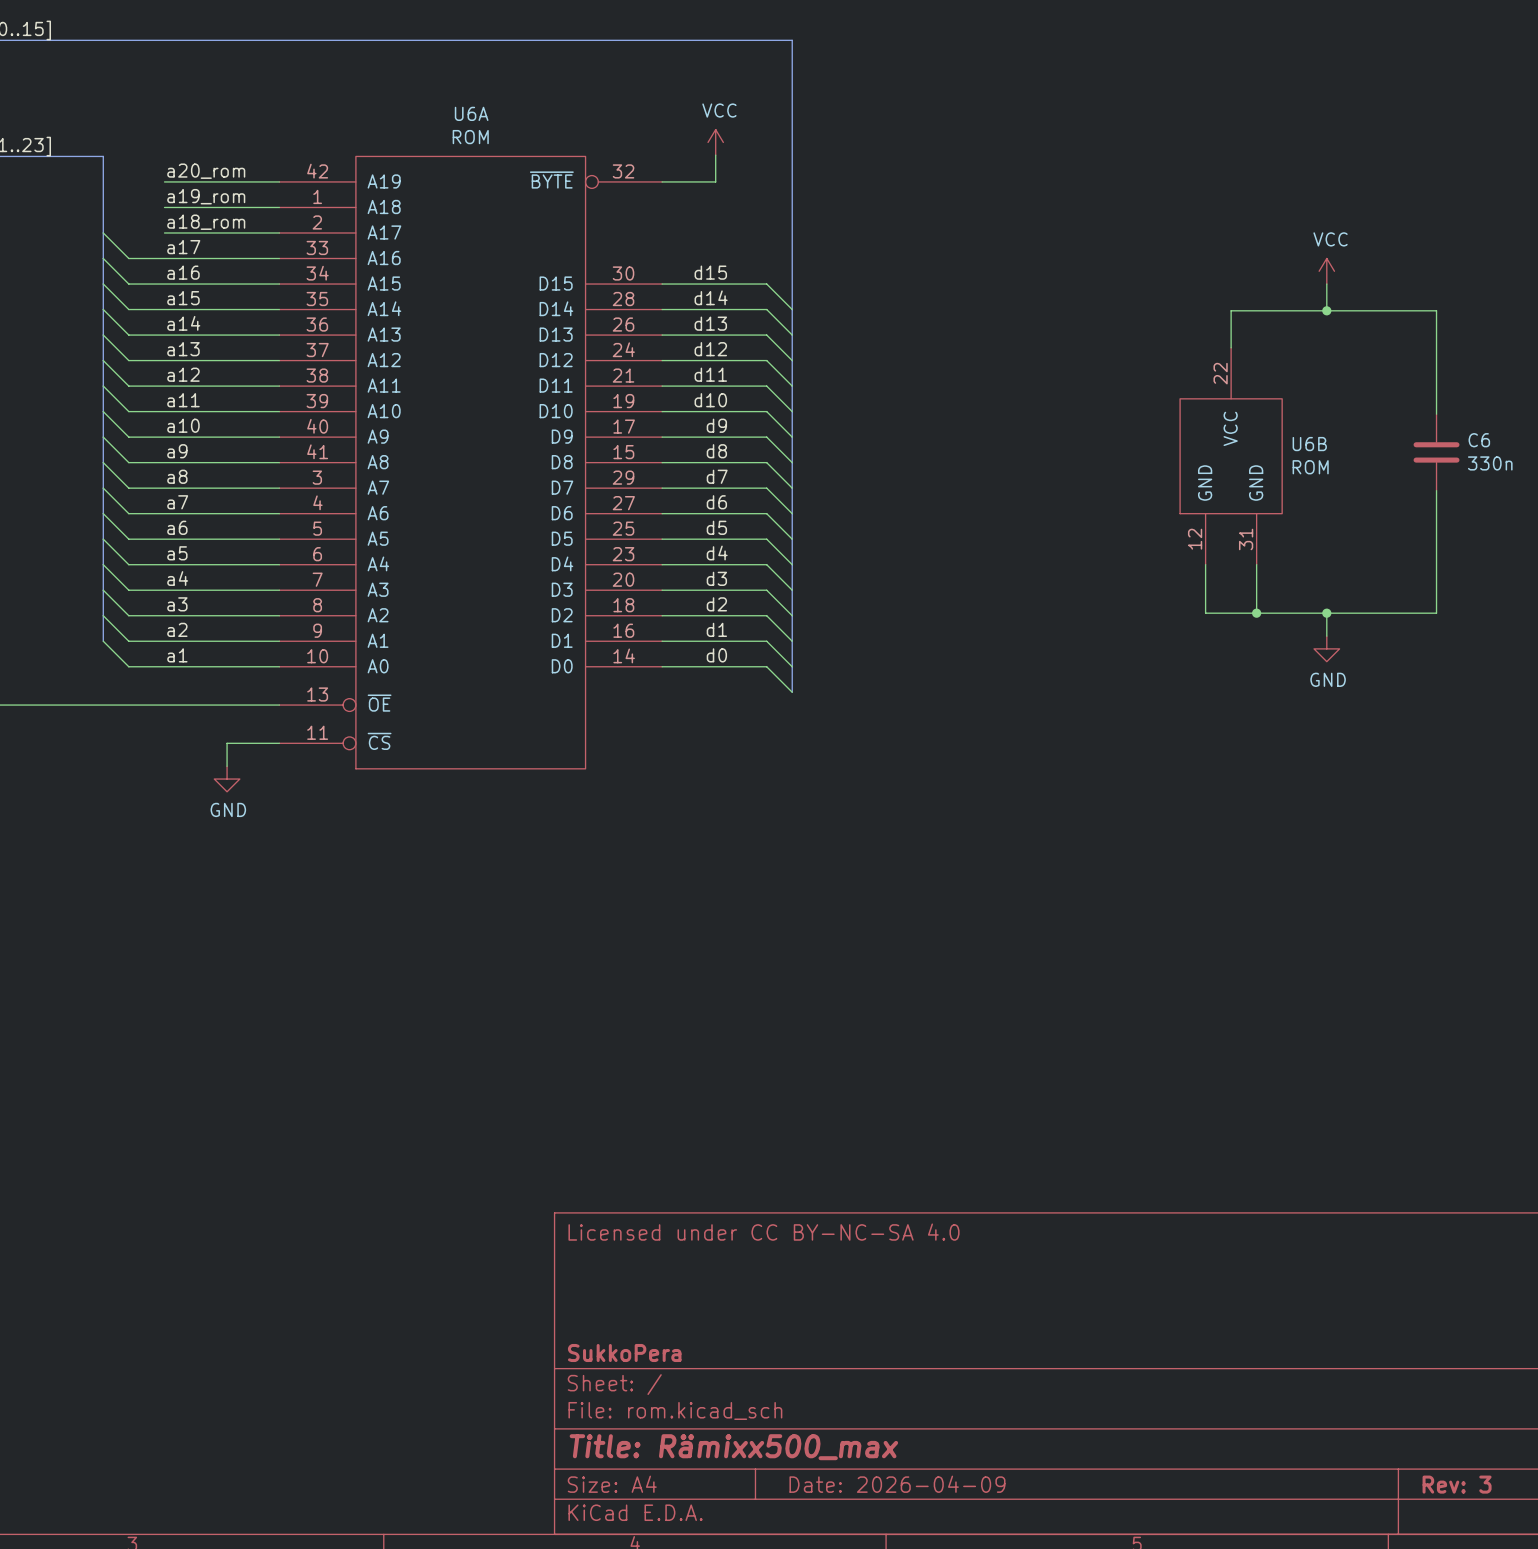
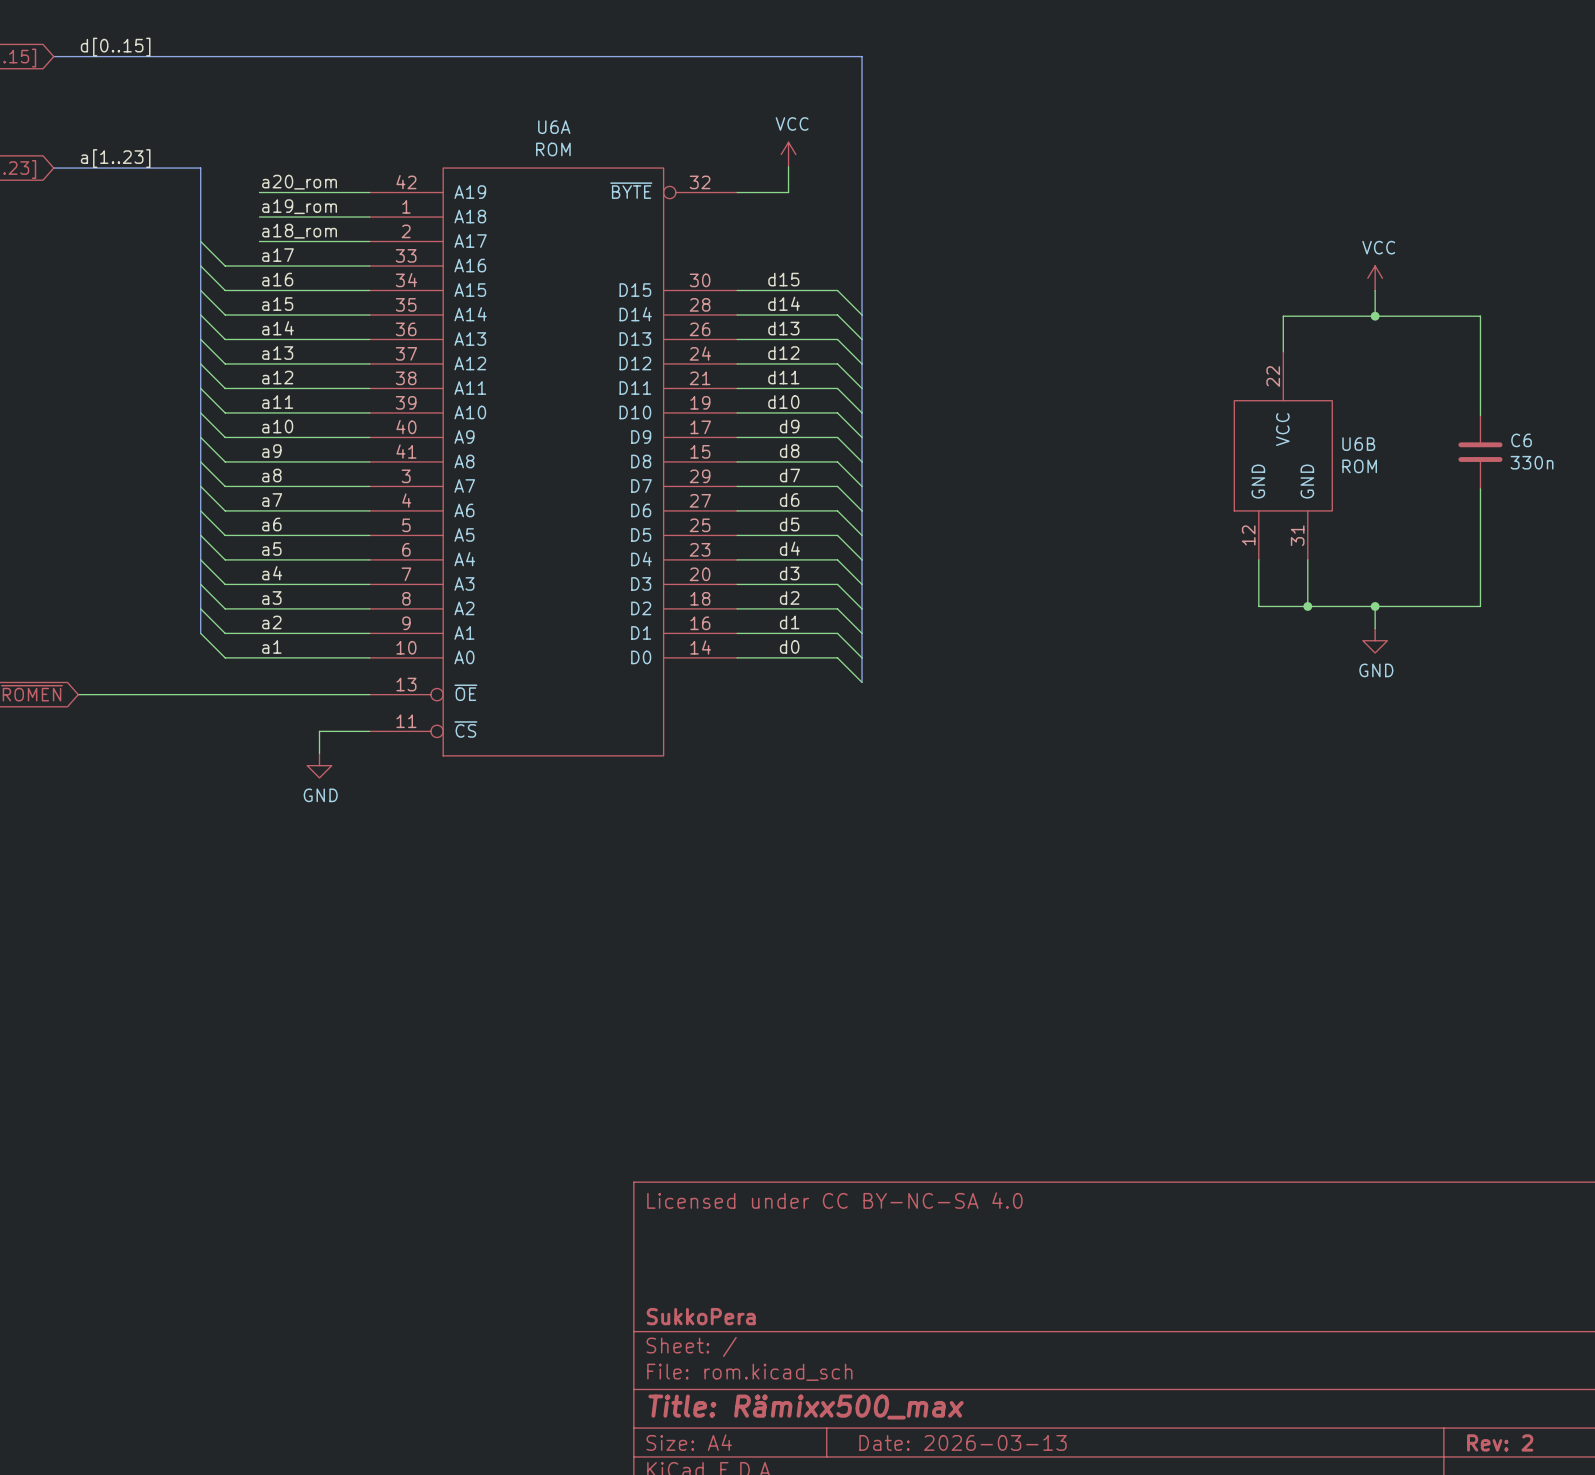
title block: Date: 2026-04-09 (897, 1484) -> Date: 2026-03-13 (963, 1442)
title block: Rev: 3 (1457, 1484) -> Rev: 2 (1500, 1442)

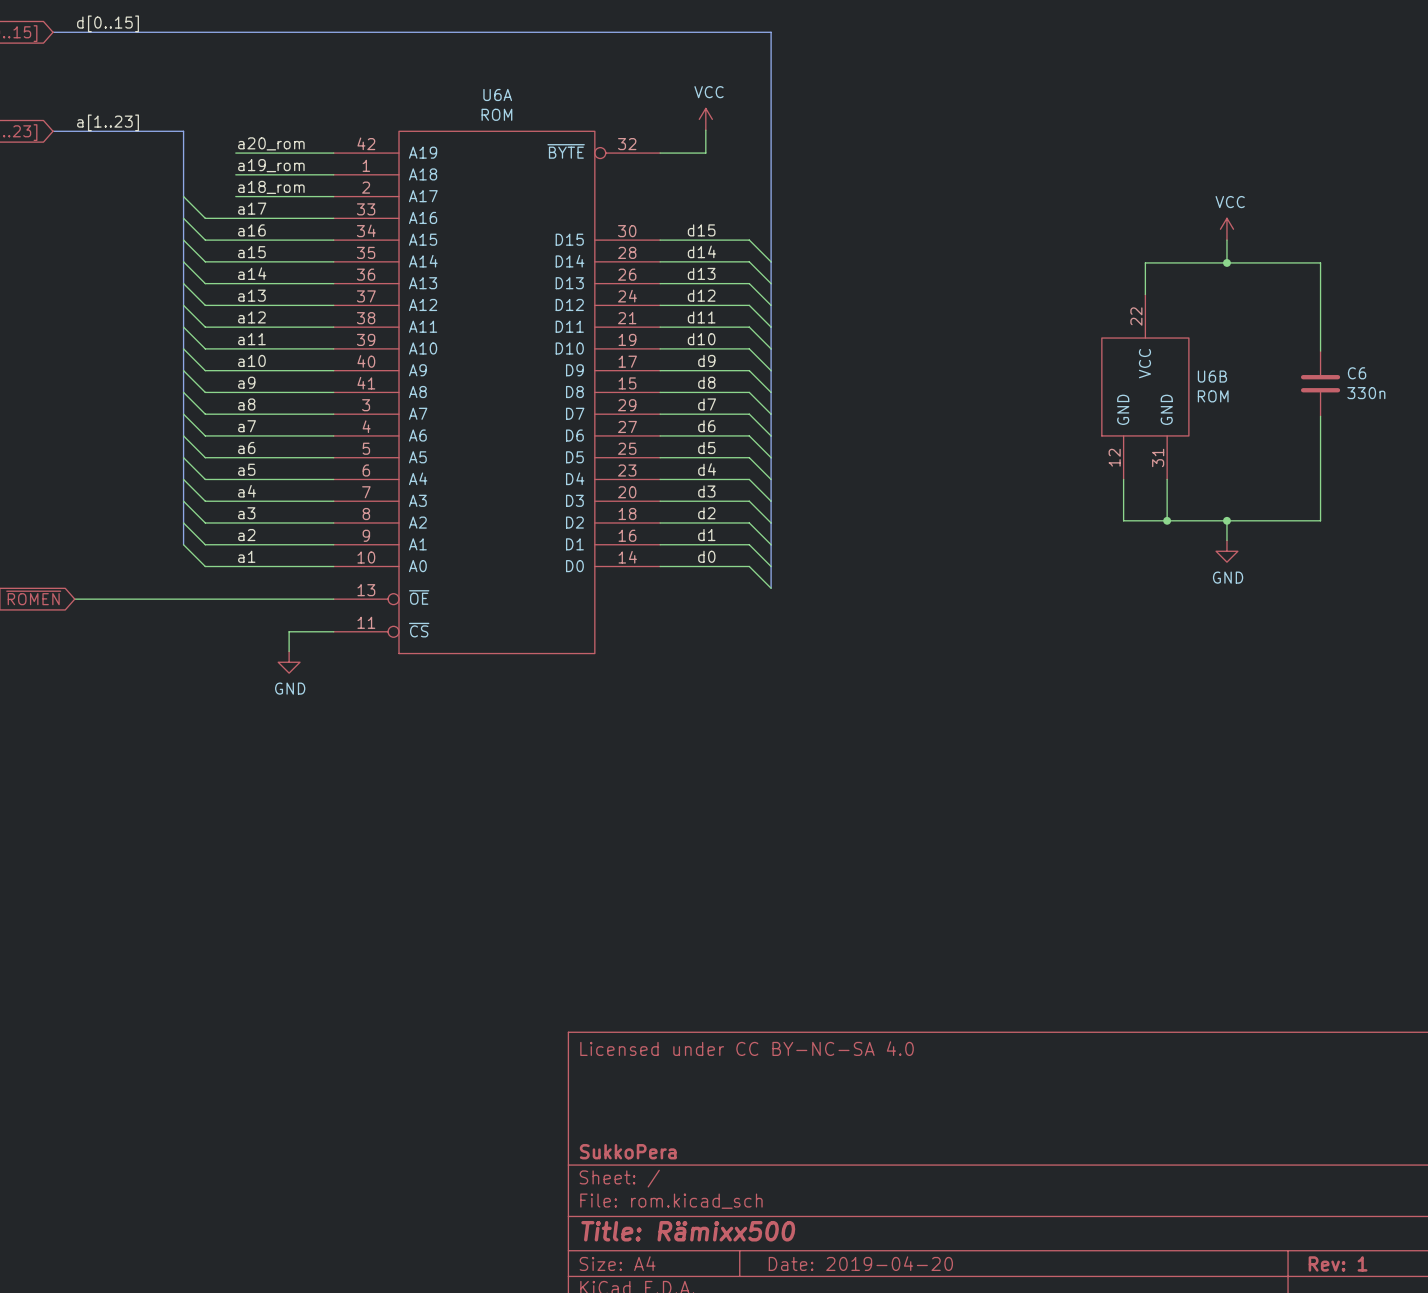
title block: Title: Rämixx500_max (806, 1407) -> Title: Rämixx500 (688, 1231)
title block: Date: 2026-03-13 (963, 1442) -> Date: 2019-04-20 (860, 1263)
title block: Rev: 2 (1500, 1442) -> Rev: 1 (1338, 1263)

